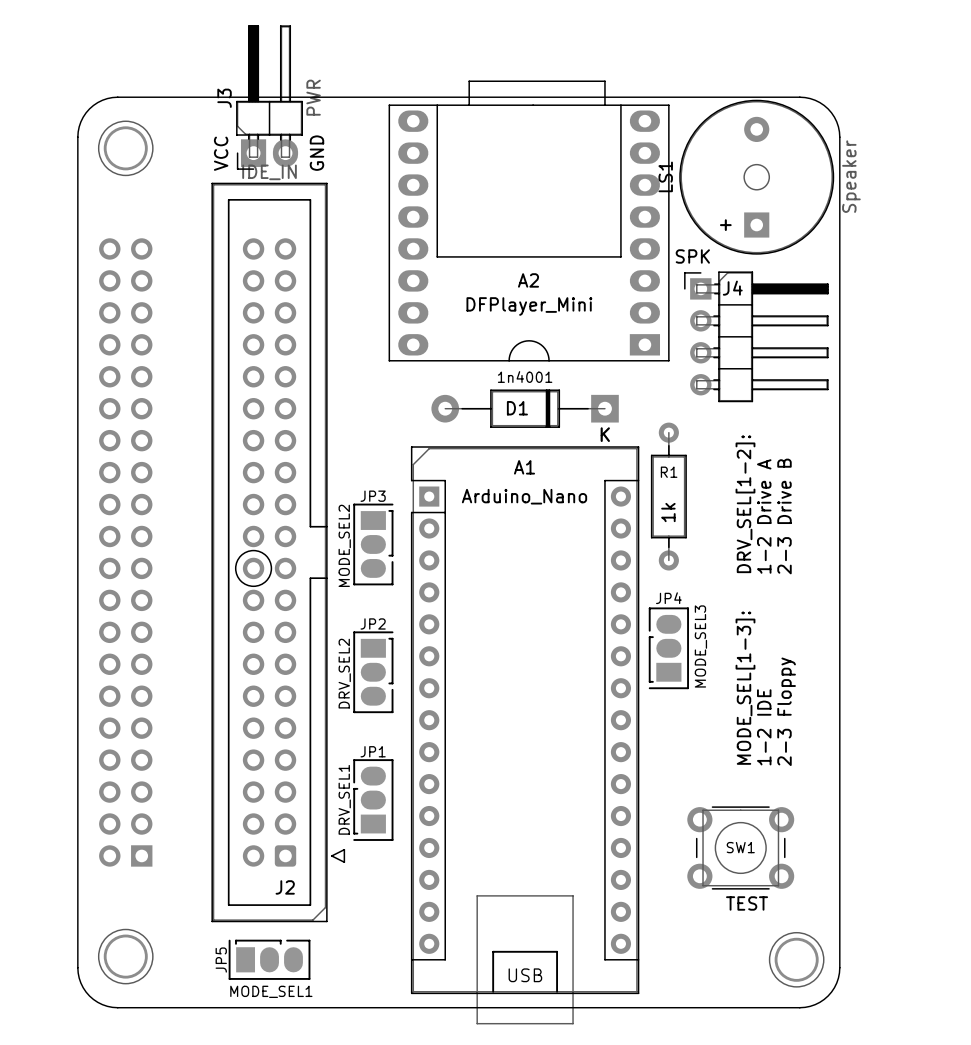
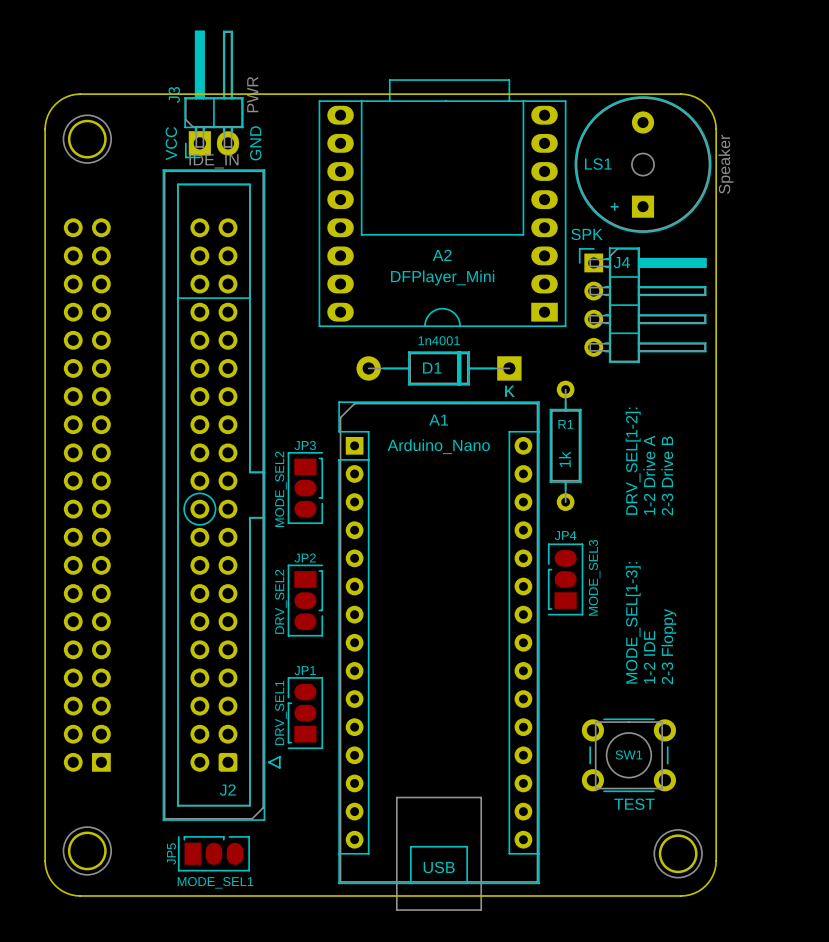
LS1 name rotation: 0° (665, 176) -> 90° clockwise (598, 164)
J2 footprint: [211, 182, 346, 923] -> [162, 169, 281, 821]

